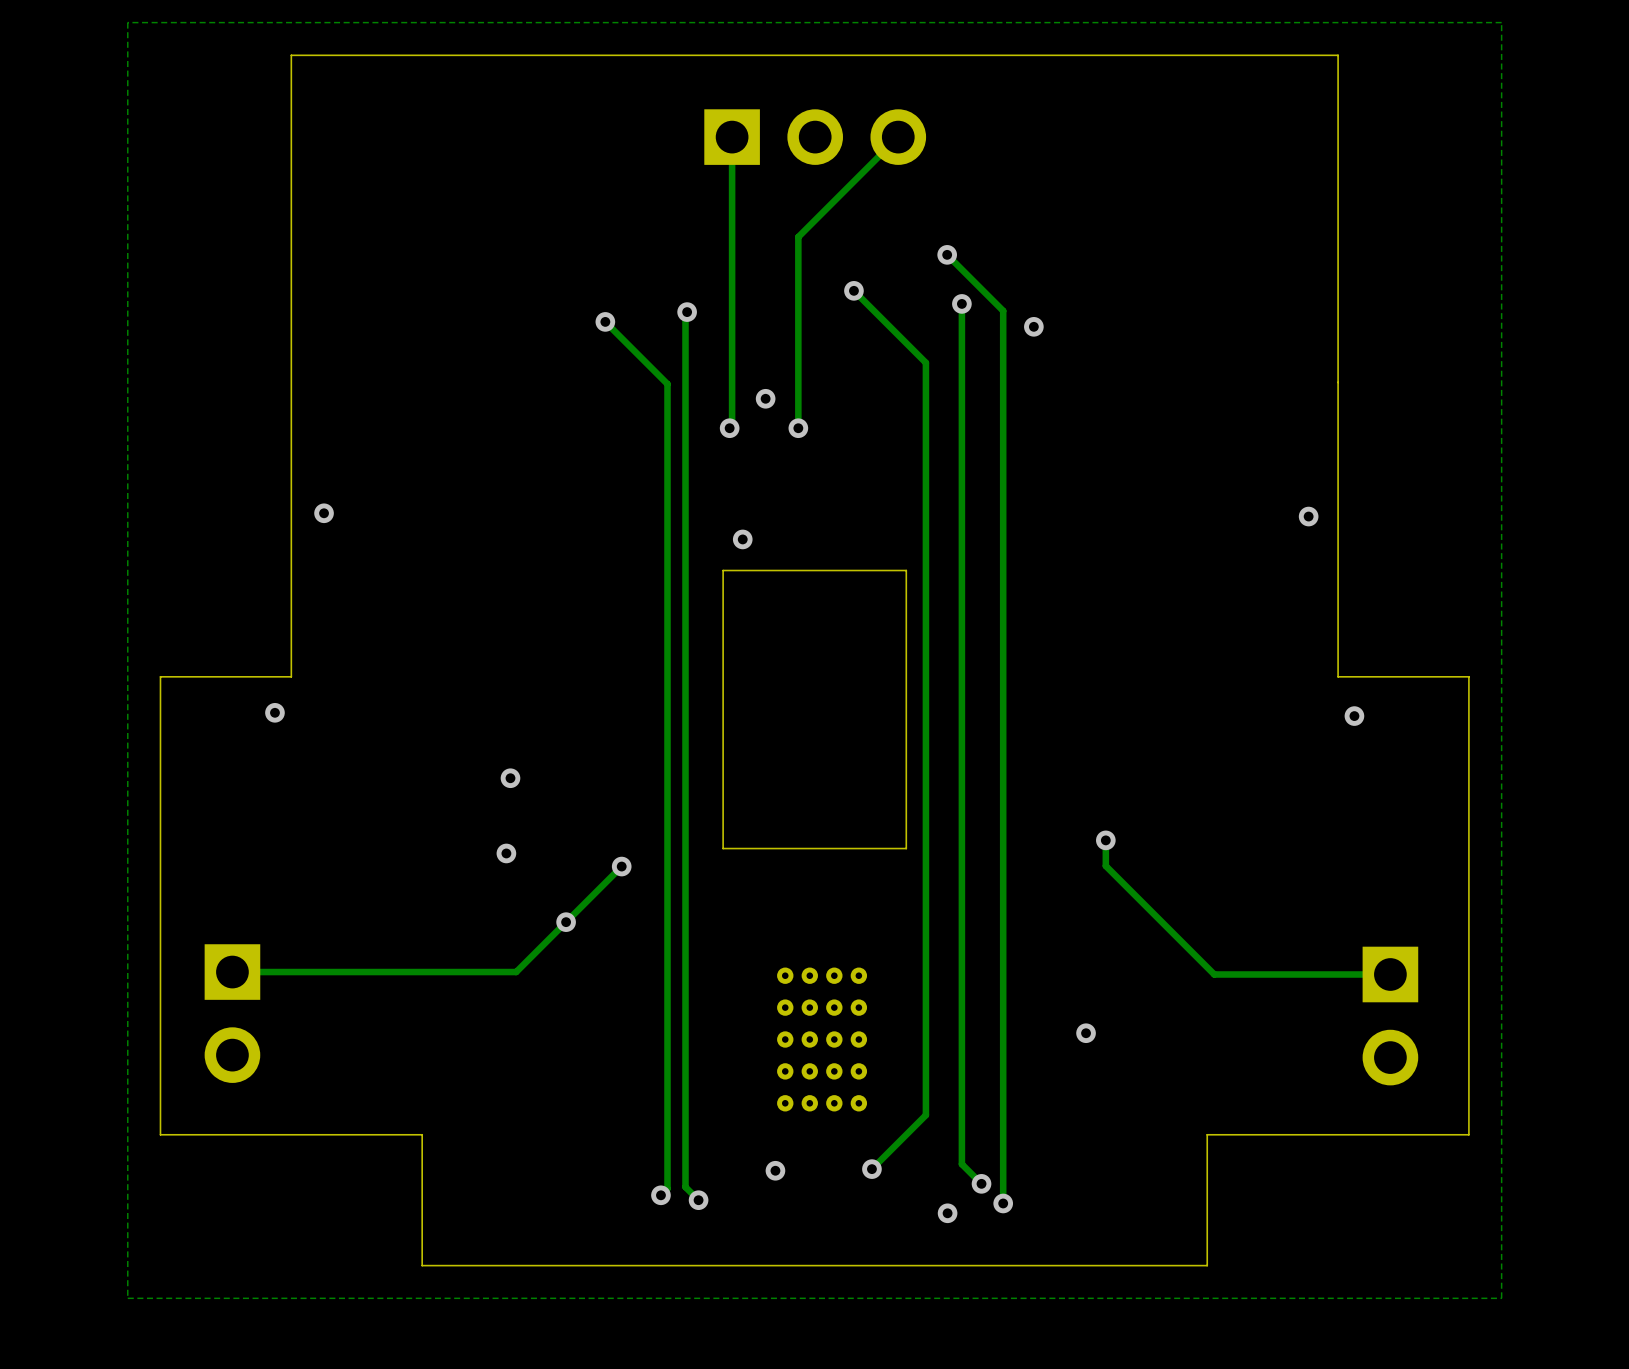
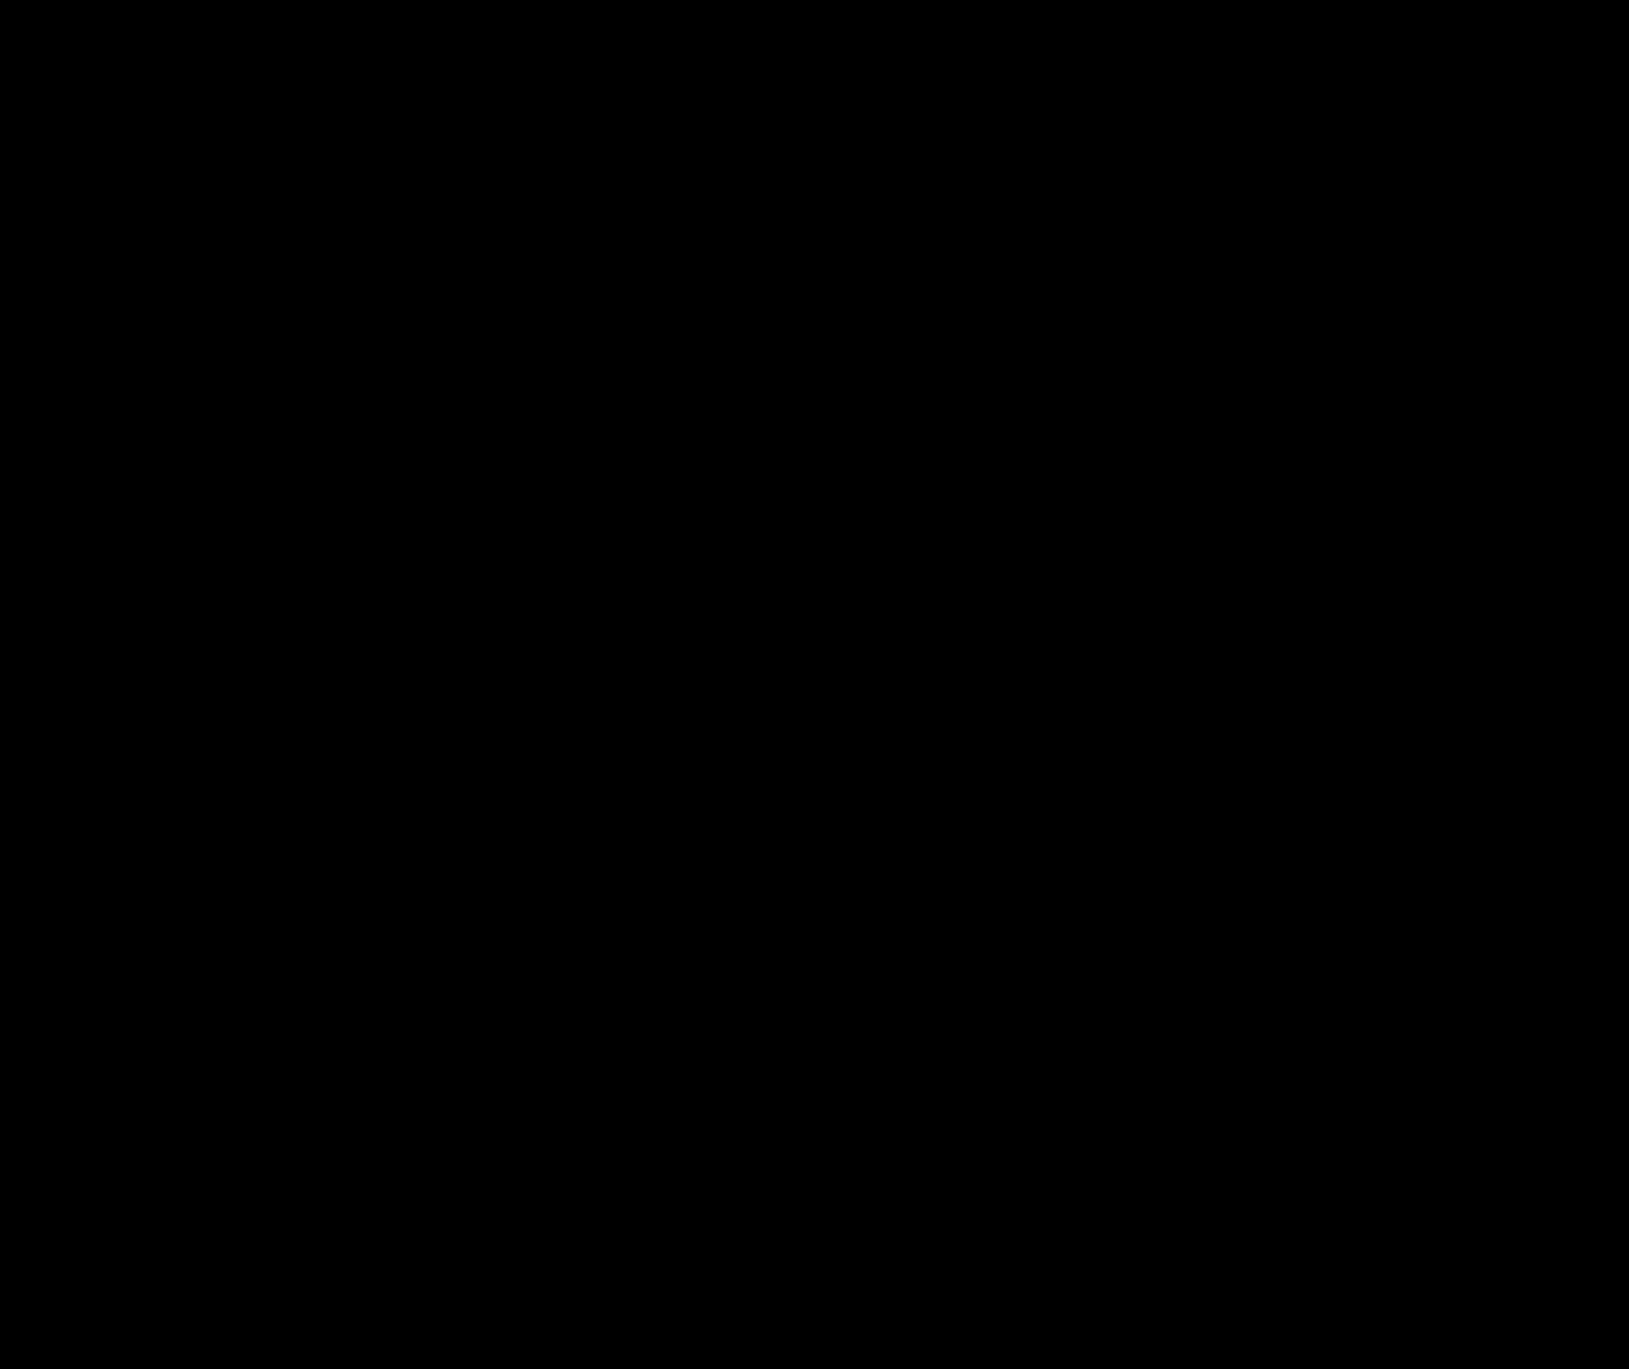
zone outline: (1501, 22) (1501, 1298) (127, 1298) (127, 22) (1501, 22) -> none
board edge: (1338, 55) (1338, 676) (1468, 676) (1468, 1134) (1207, 1134) (1207, 1265) (422, 1265) (422, 1134) (160, 1134) (160, 676) (291, 676) (291, 55) (1338, 55) -> none
track: (732, 137) (732, 425) (729, 428) -> none
part: (815, 137) -> none
track: (898, 137) (798, 237) (798, 428) -> none
track: (947, 254) (1003, 310) (1003, 1203) -> none
via: (947, 254) -> none
track: (853, 290) (925, 362) (925, 1115) (871, 1169) -> none
via: (853, 290) -> none
track: (961, 303) (961, 1164) (981, 1183) -> none
via: (961, 303) -> none
track: (687, 312) (685, 313) (685, 1187) (698, 1200) -> none
via: (687, 312) -> none
track: (605, 321) (667, 384) (667, 1188) (660, 1195) -> none
via: (605, 321) -> none
via: (1033, 326) -> none
via: (765, 398) -> none
via: (729, 428) -> none
via: (798, 428) -> none
via: (324, 513) -> none
via: (1308, 516) -> none
via: (742, 539) -> none
board edge: (906, 570) (723, 570) (723, 848) (906, 848) (906, 570) -> none
via: (274, 712) -> none
via: (1354, 716) -> none
via: (510, 778) -> none
track: (1105, 840) (1105, 866) (1214, 974) (1390, 974) -> none
via: (1105, 840) -> none
via: (506, 853) -> none
track: (624, 863) (516, 972) (232, 972) -> none
via: (621, 866) -> none
via: (566, 922) -> none
part: (232, 1013) -> none
part: (1390, 1016) -> none
via: (1086, 1033) -> none
part: (822, 1039) -> none
via: (871, 1169) -> none
via: (775, 1170) -> none
via: (981, 1183) -> none
via: (660, 1195) -> none
via: (698, 1200) -> none
via: (1003, 1203) -> none
via: (947, 1213) -> none

